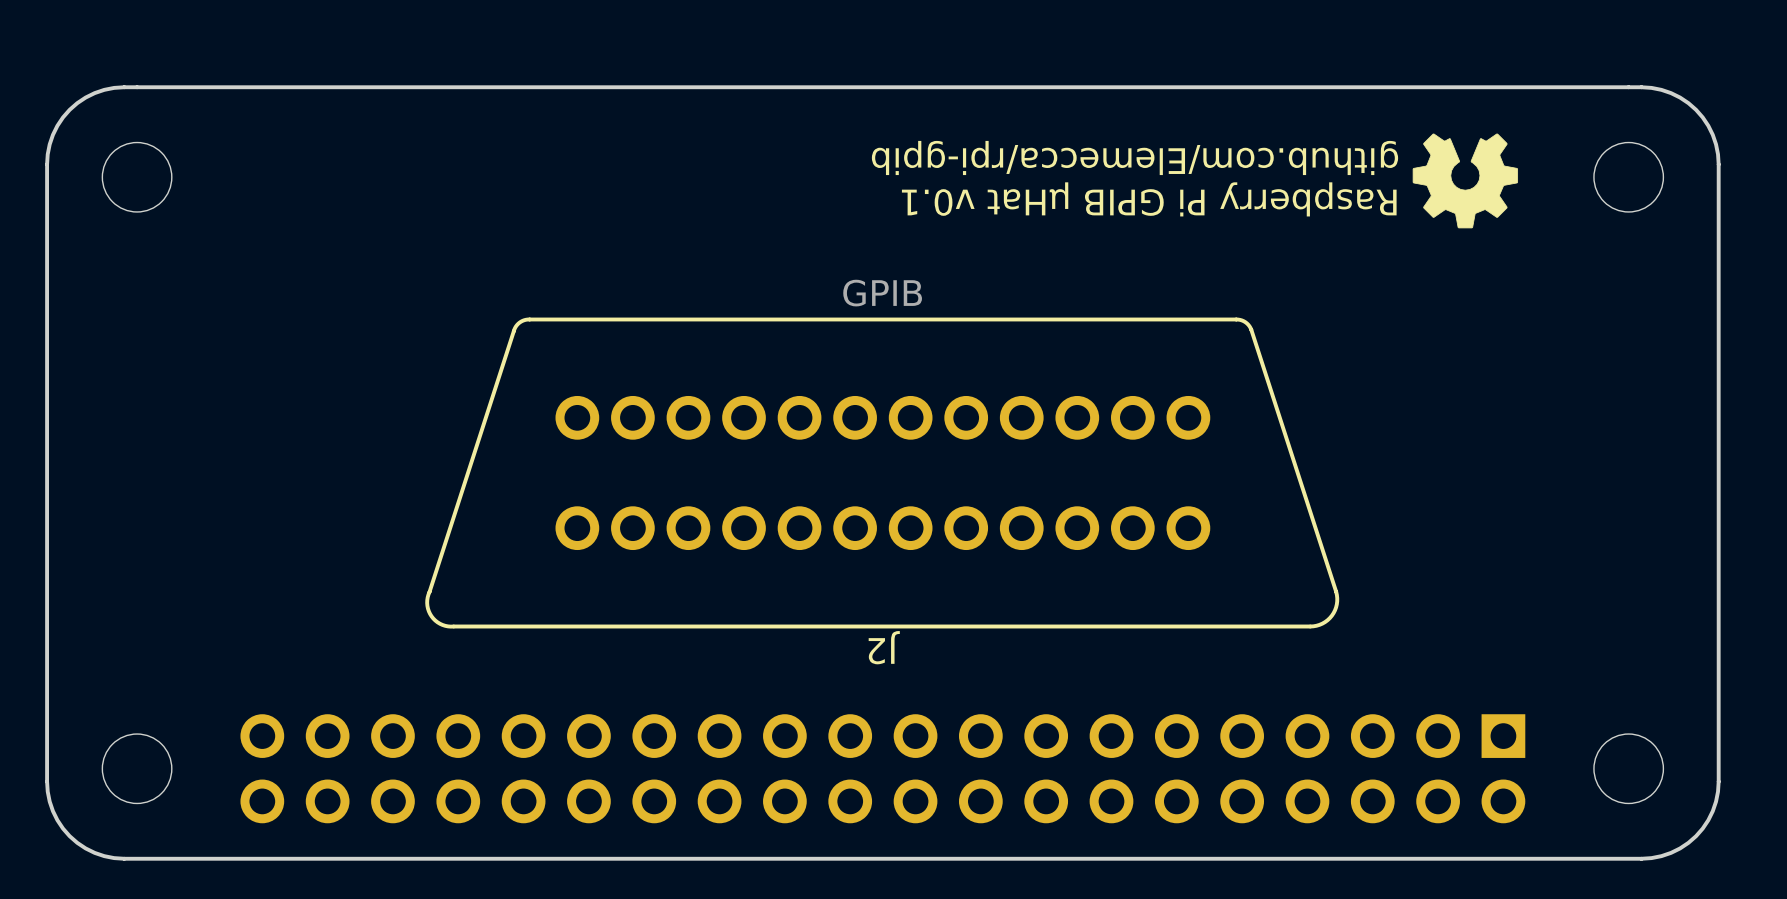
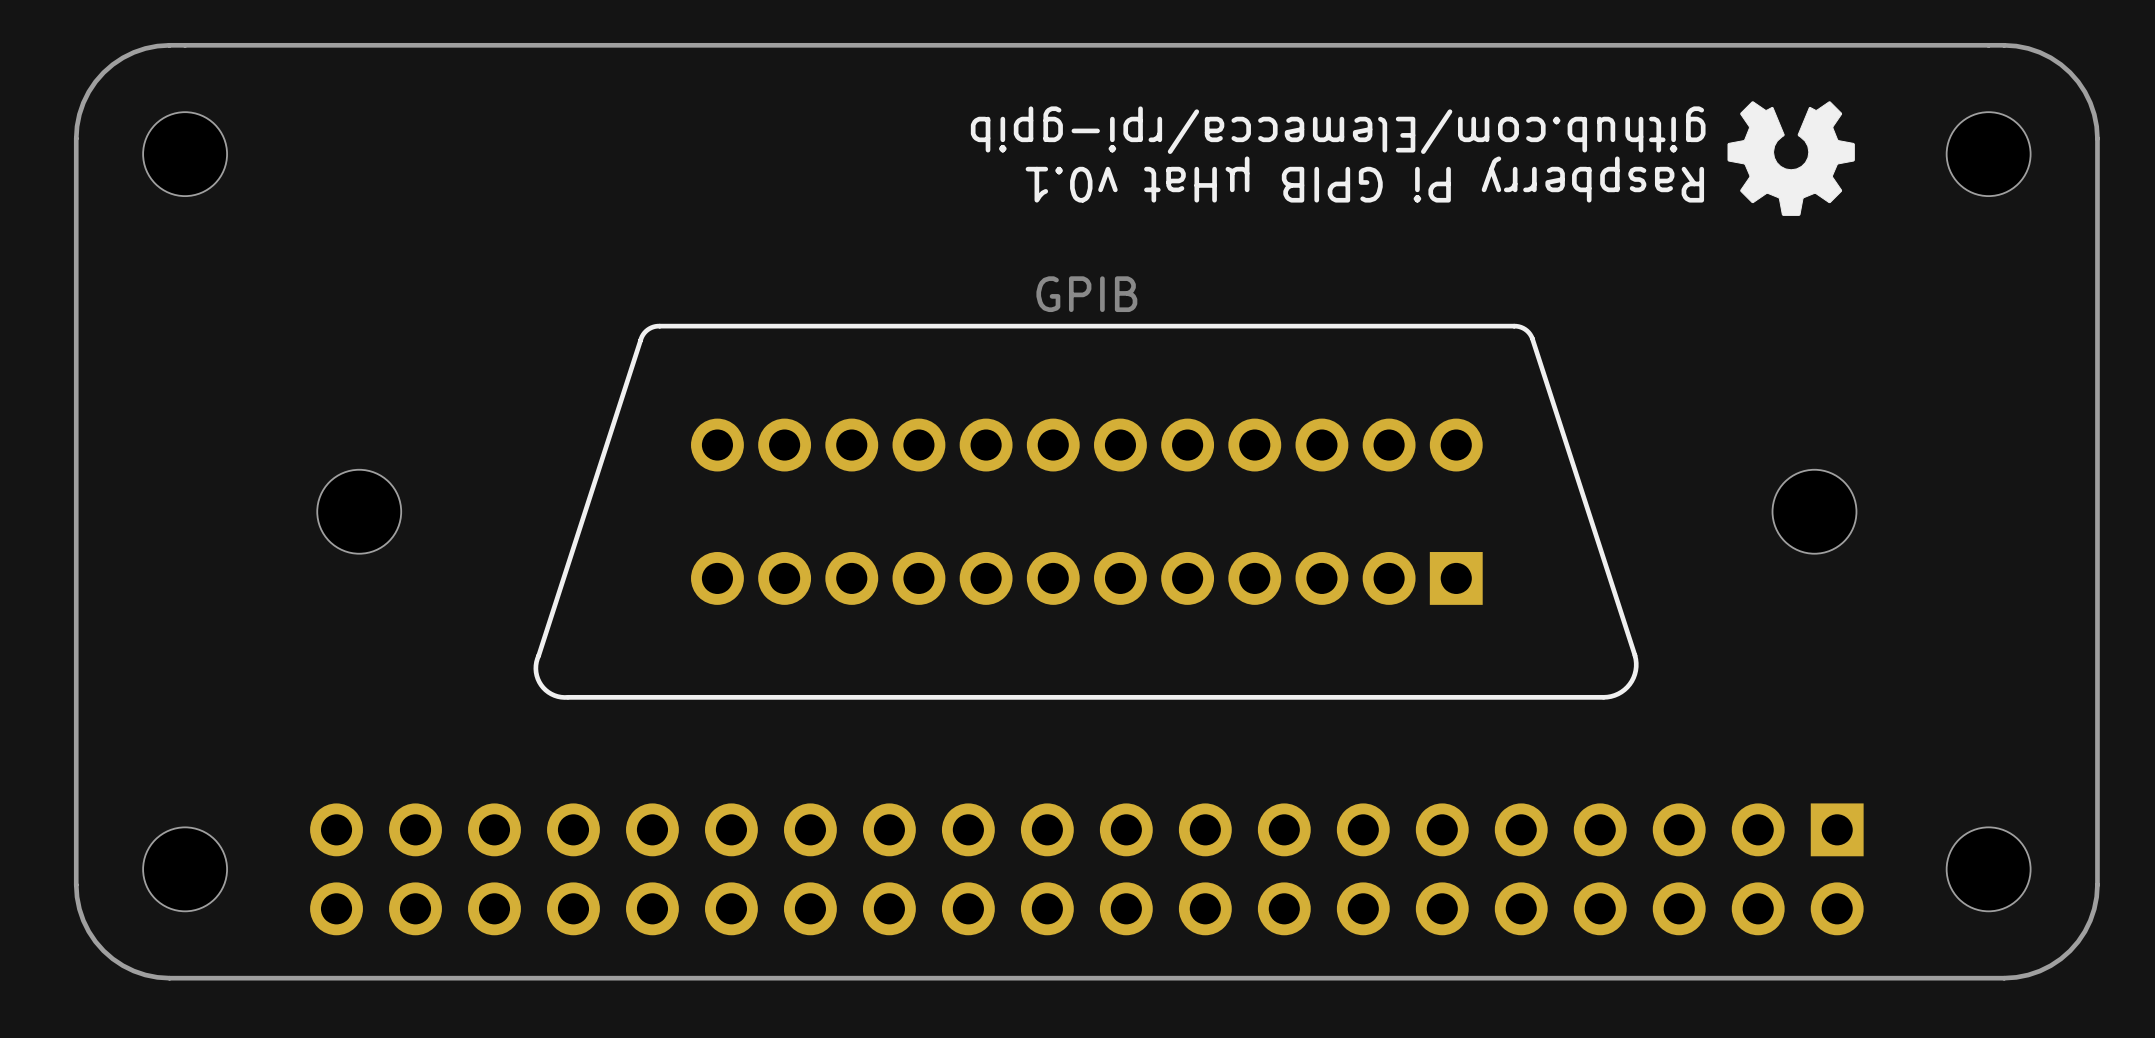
J2: GPIB (882, 473) -> none
part: none -> GPIB (1086, 511)

